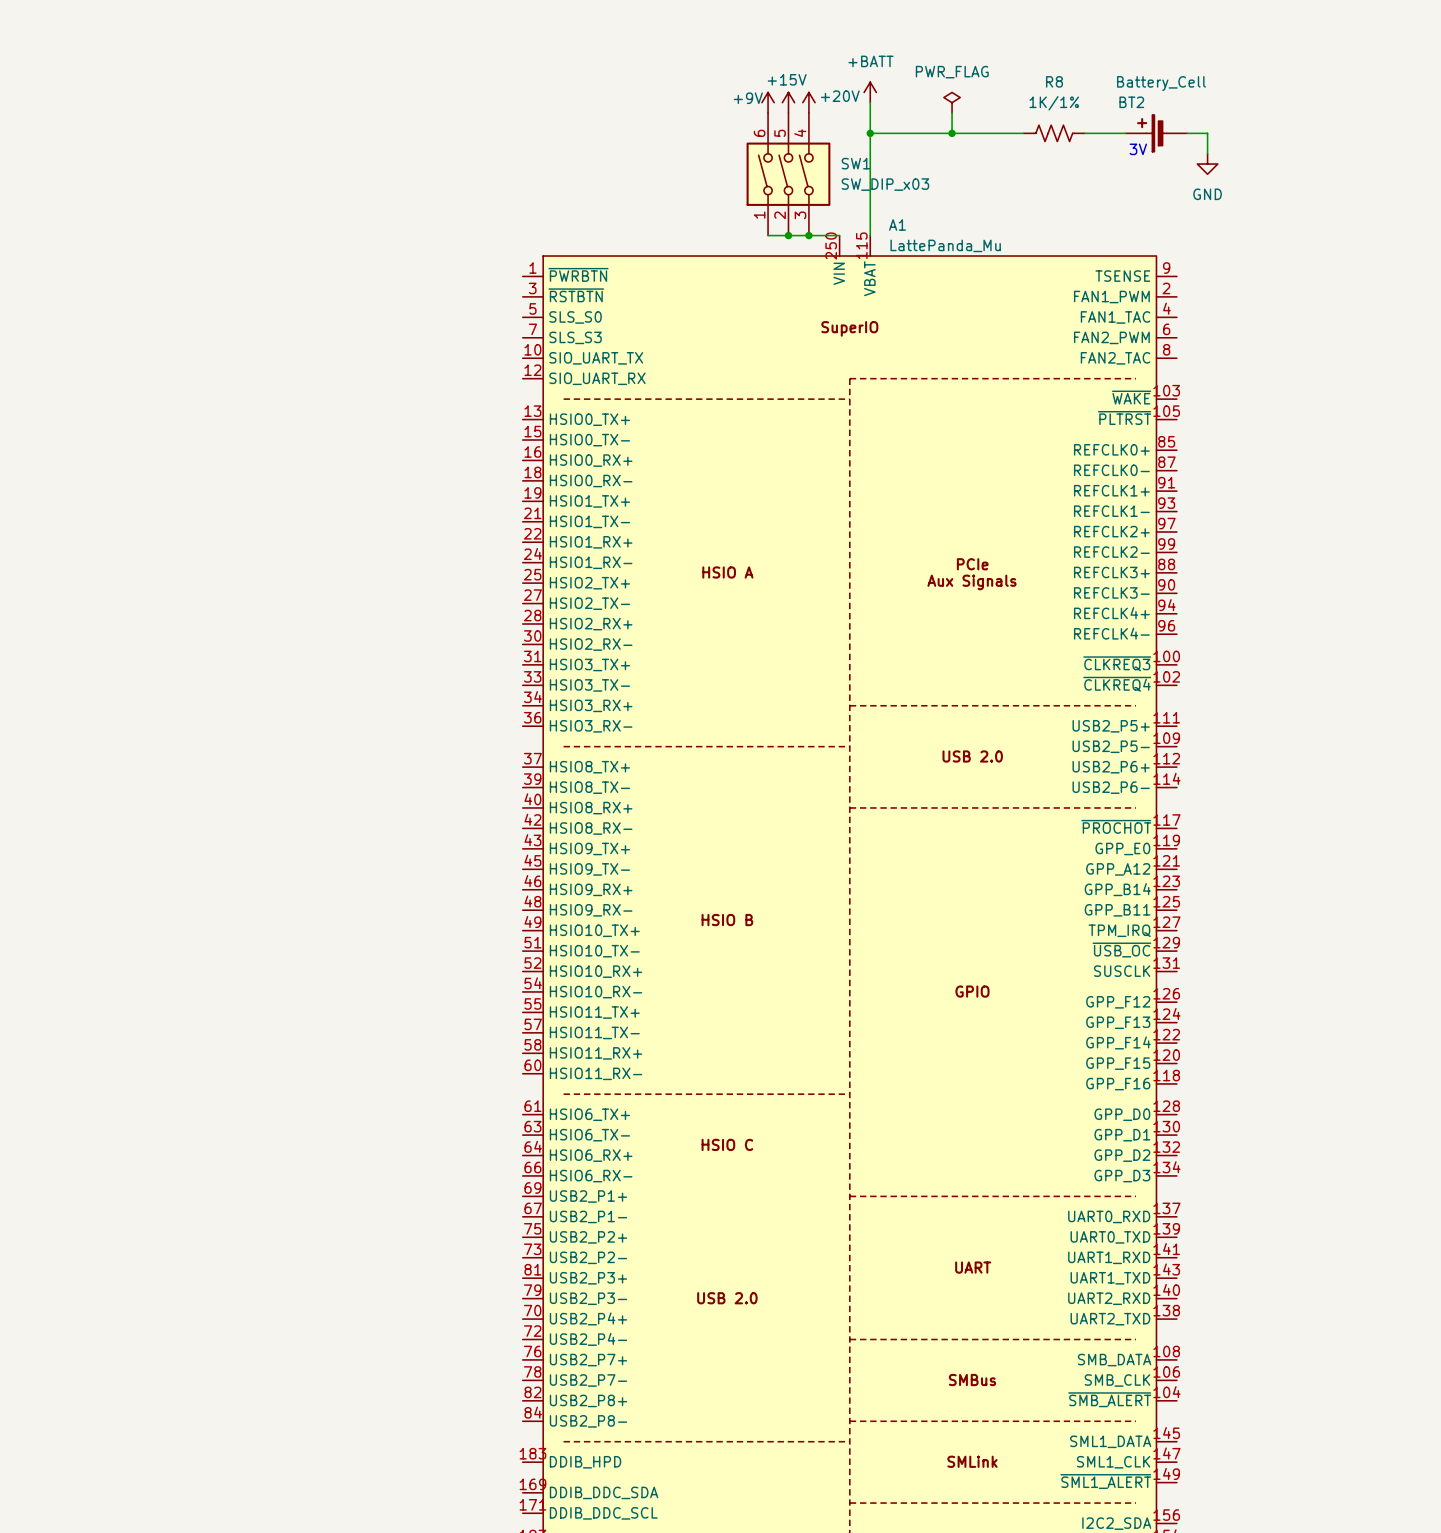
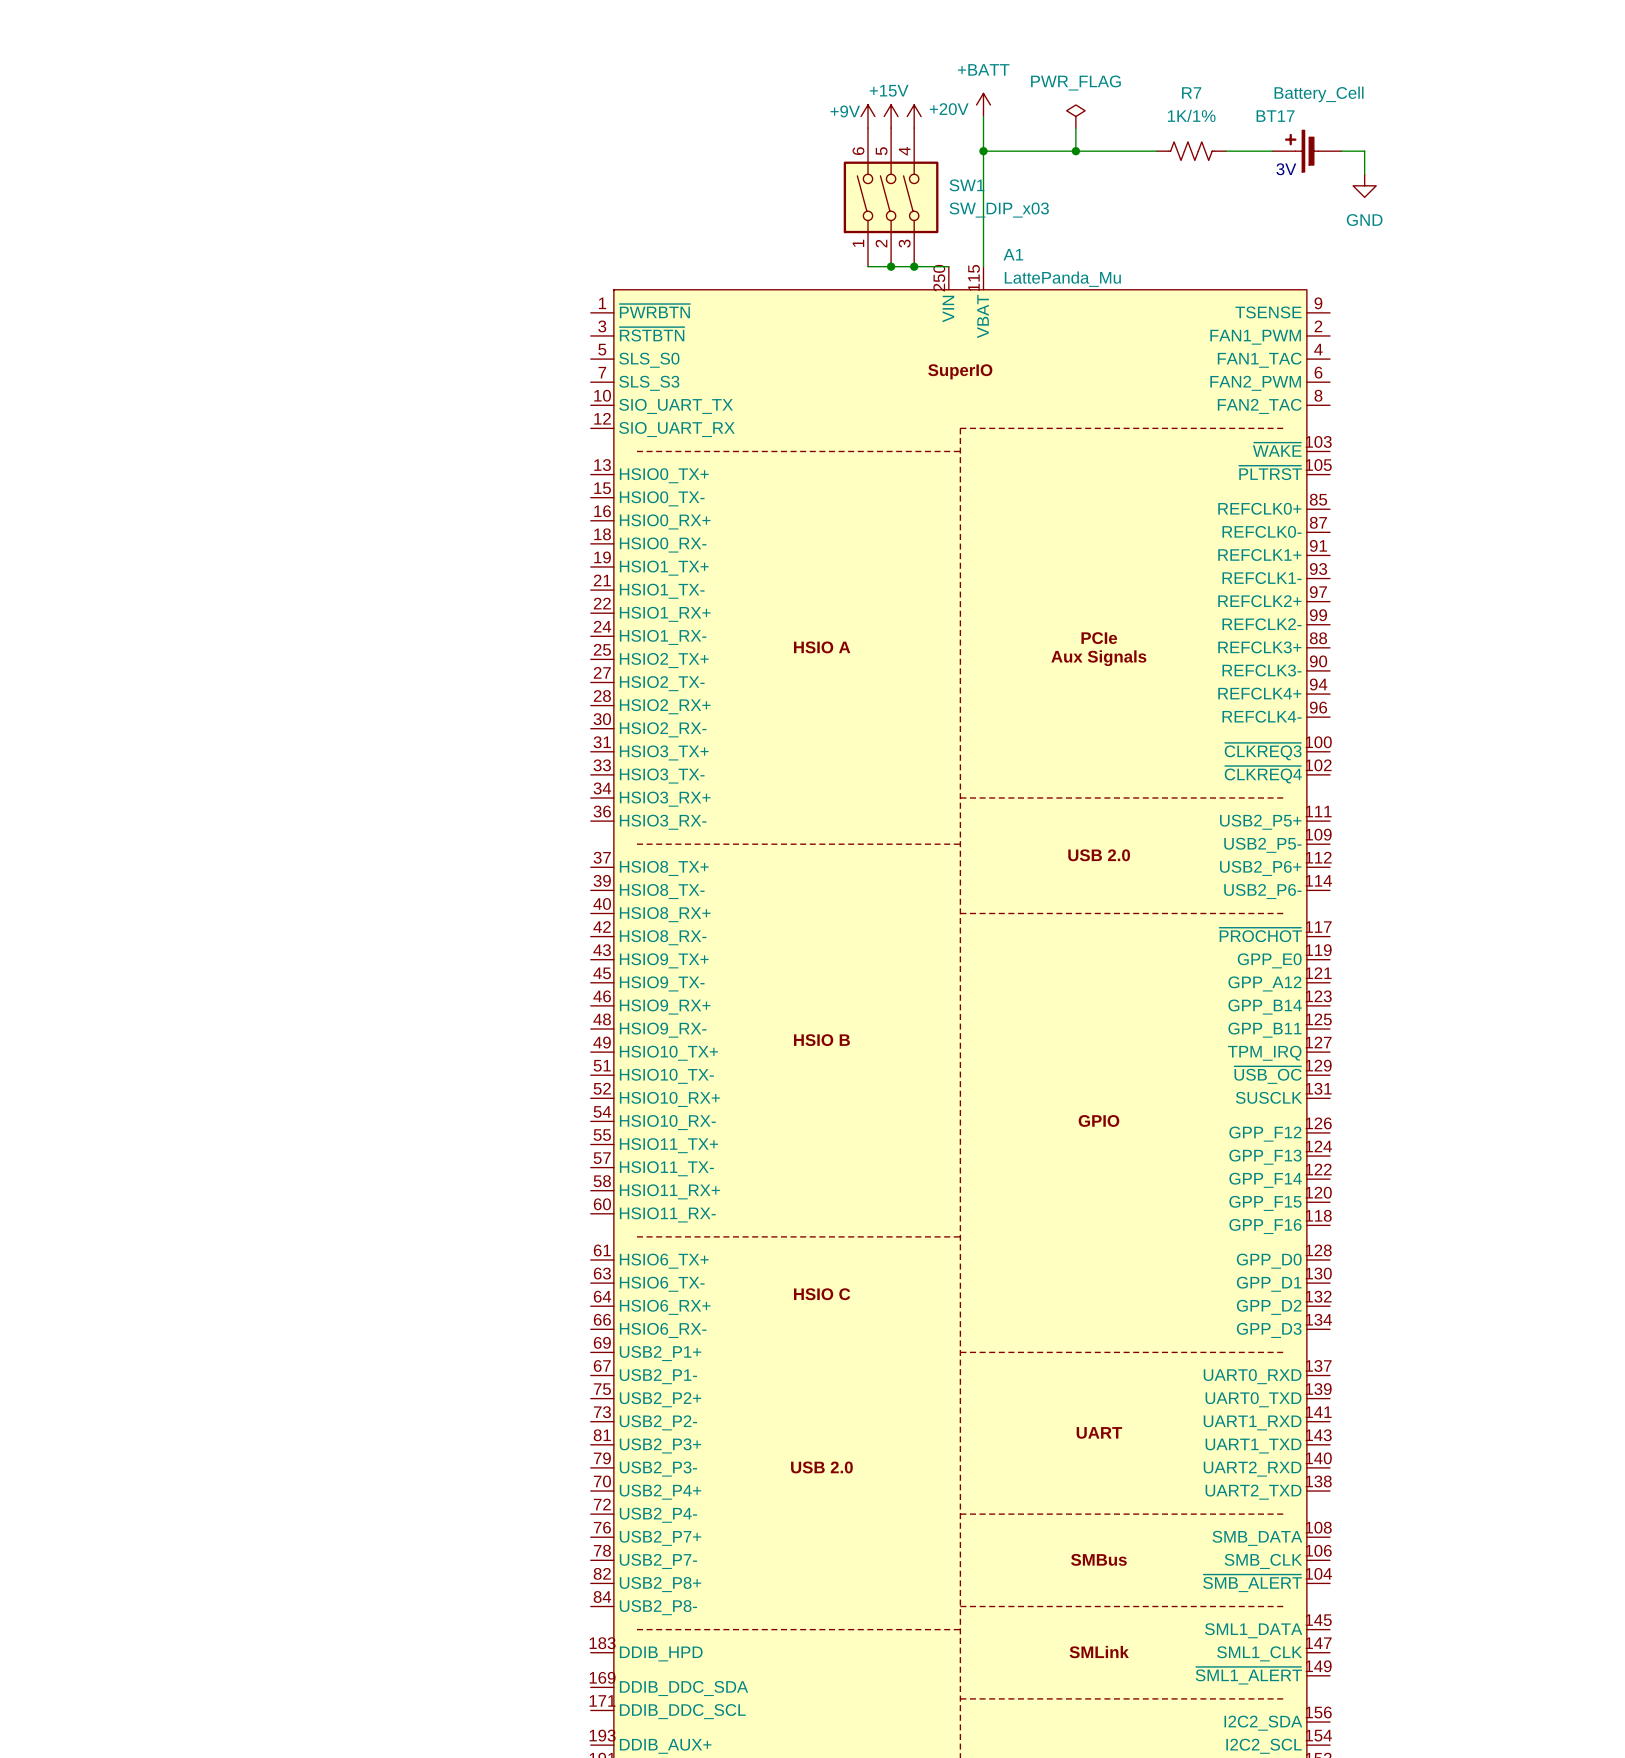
R8 name: R8 (1054, 81) -> R7 (1191, 92)
BT2 name: BT2 (1131, 102) -> BT17 (1275, 116)

